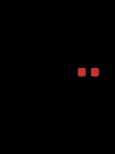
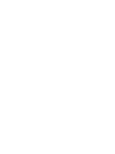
part: (88, 72) -> none

